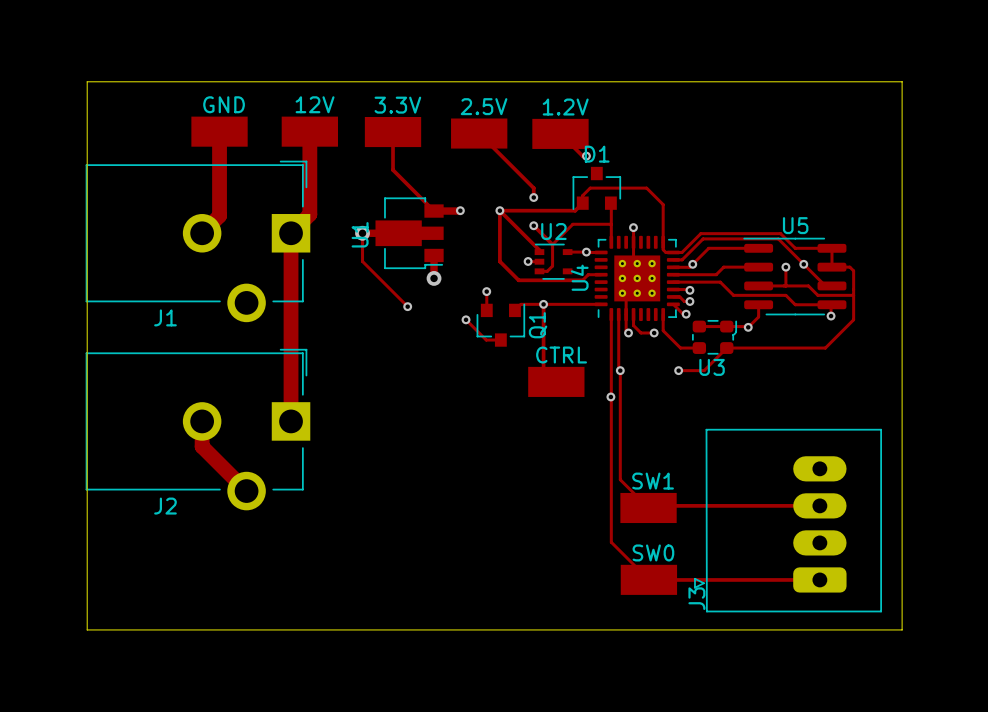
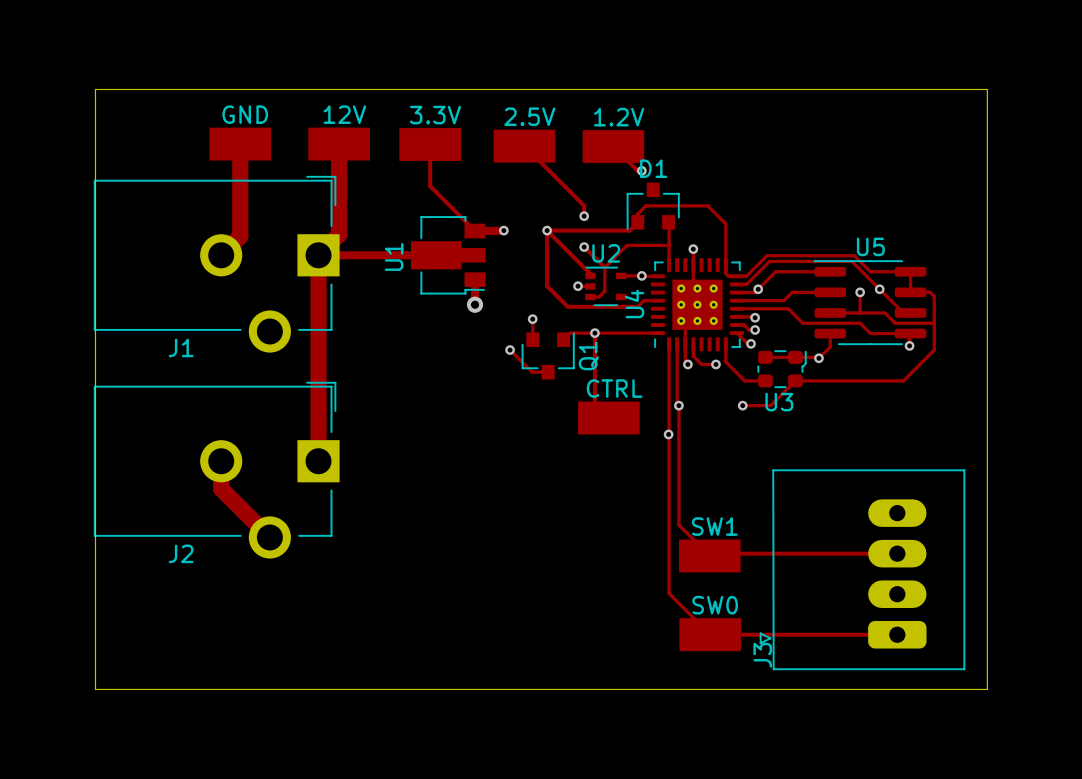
track: none -> (318, 255) (402, 255)
track: (362, 233) (362, 261) (407, 306) -> none
via: (362, 233) -> none
via: (407, 306) -> none

